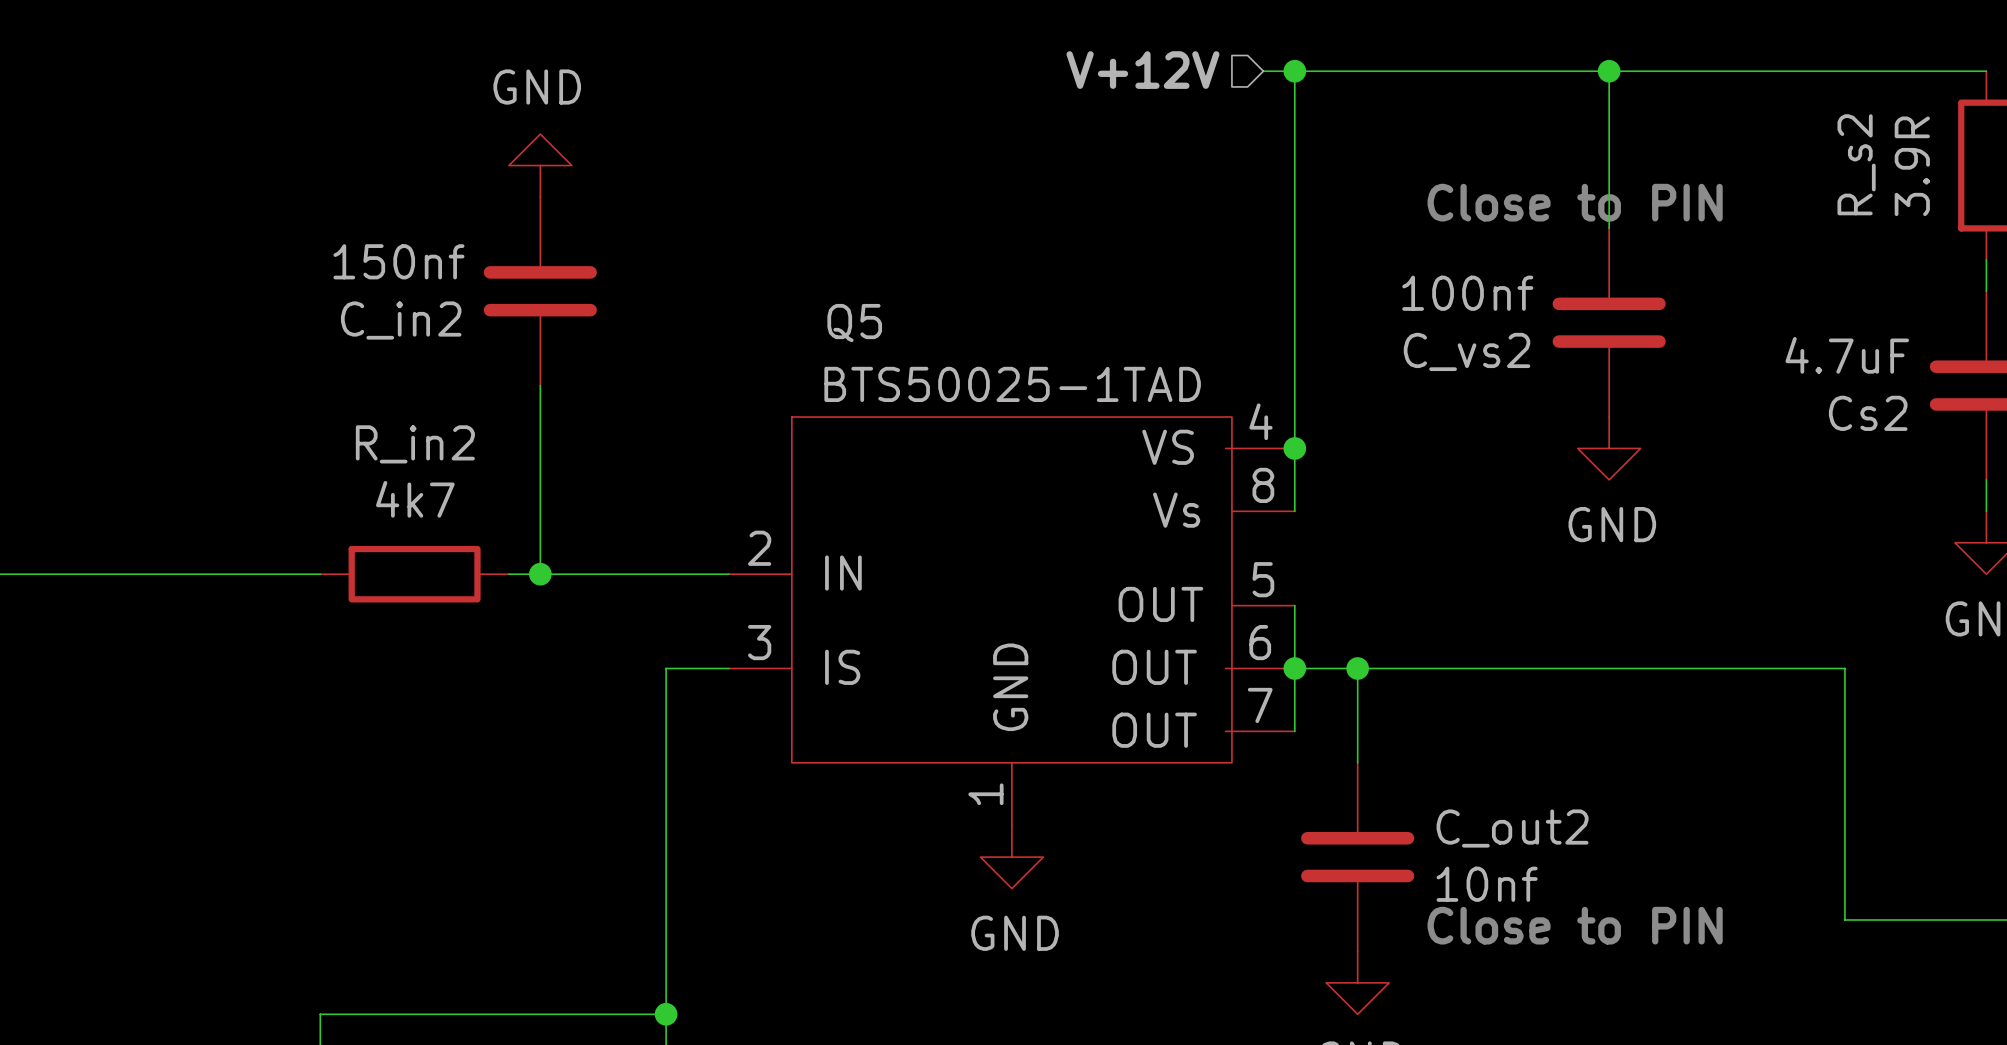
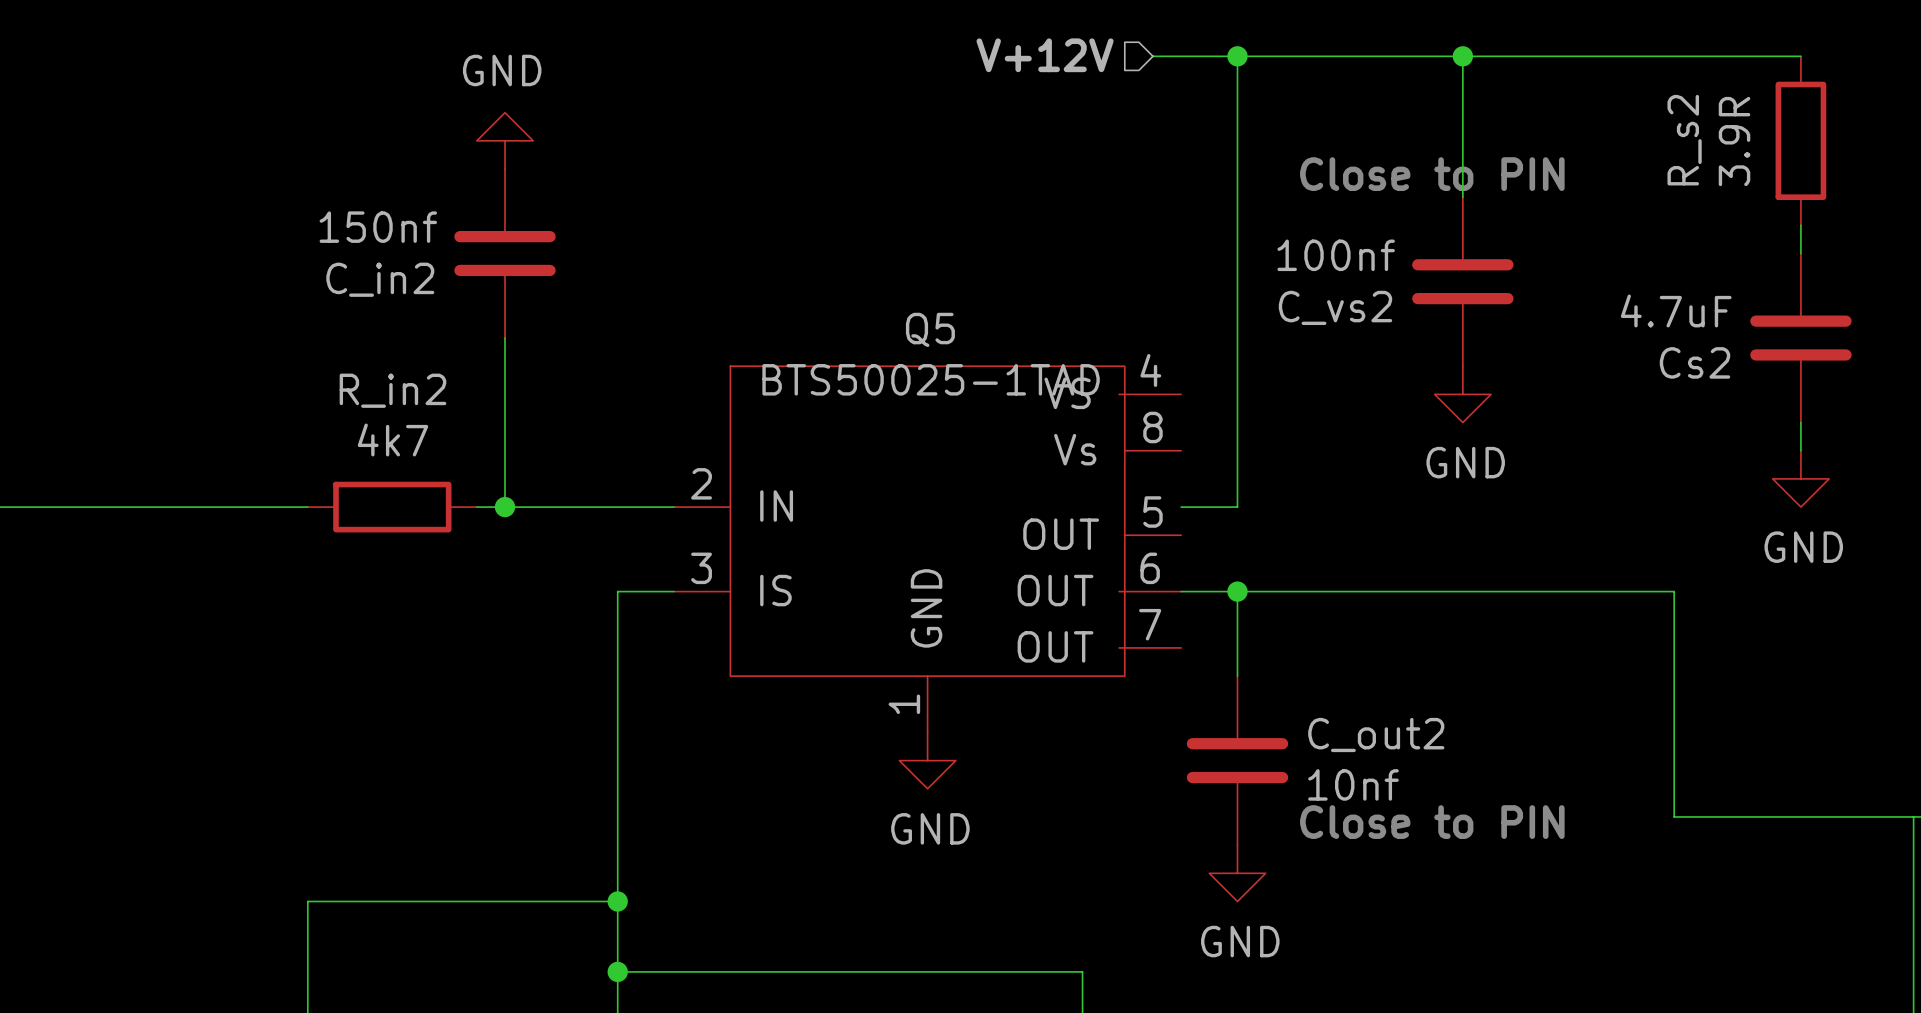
wire: (1294, 71) (1294, 511) -> none
junction position: (1294, 71) -> (1237, 56)
wire: none -> (1237, 56) (1237, 507) (1181, 507)
Q5 name position: Q5 (854, 323) -> Q5 (930, 329)
Q5 value position: BTS50025-1TAD (1012, 384) -> BTS50025-1TAD (931, 379)
junction: (1294, 448) -> none
wire: (1294, 605) (1294, 731) -> none
junction: (1294, 668) -> none

